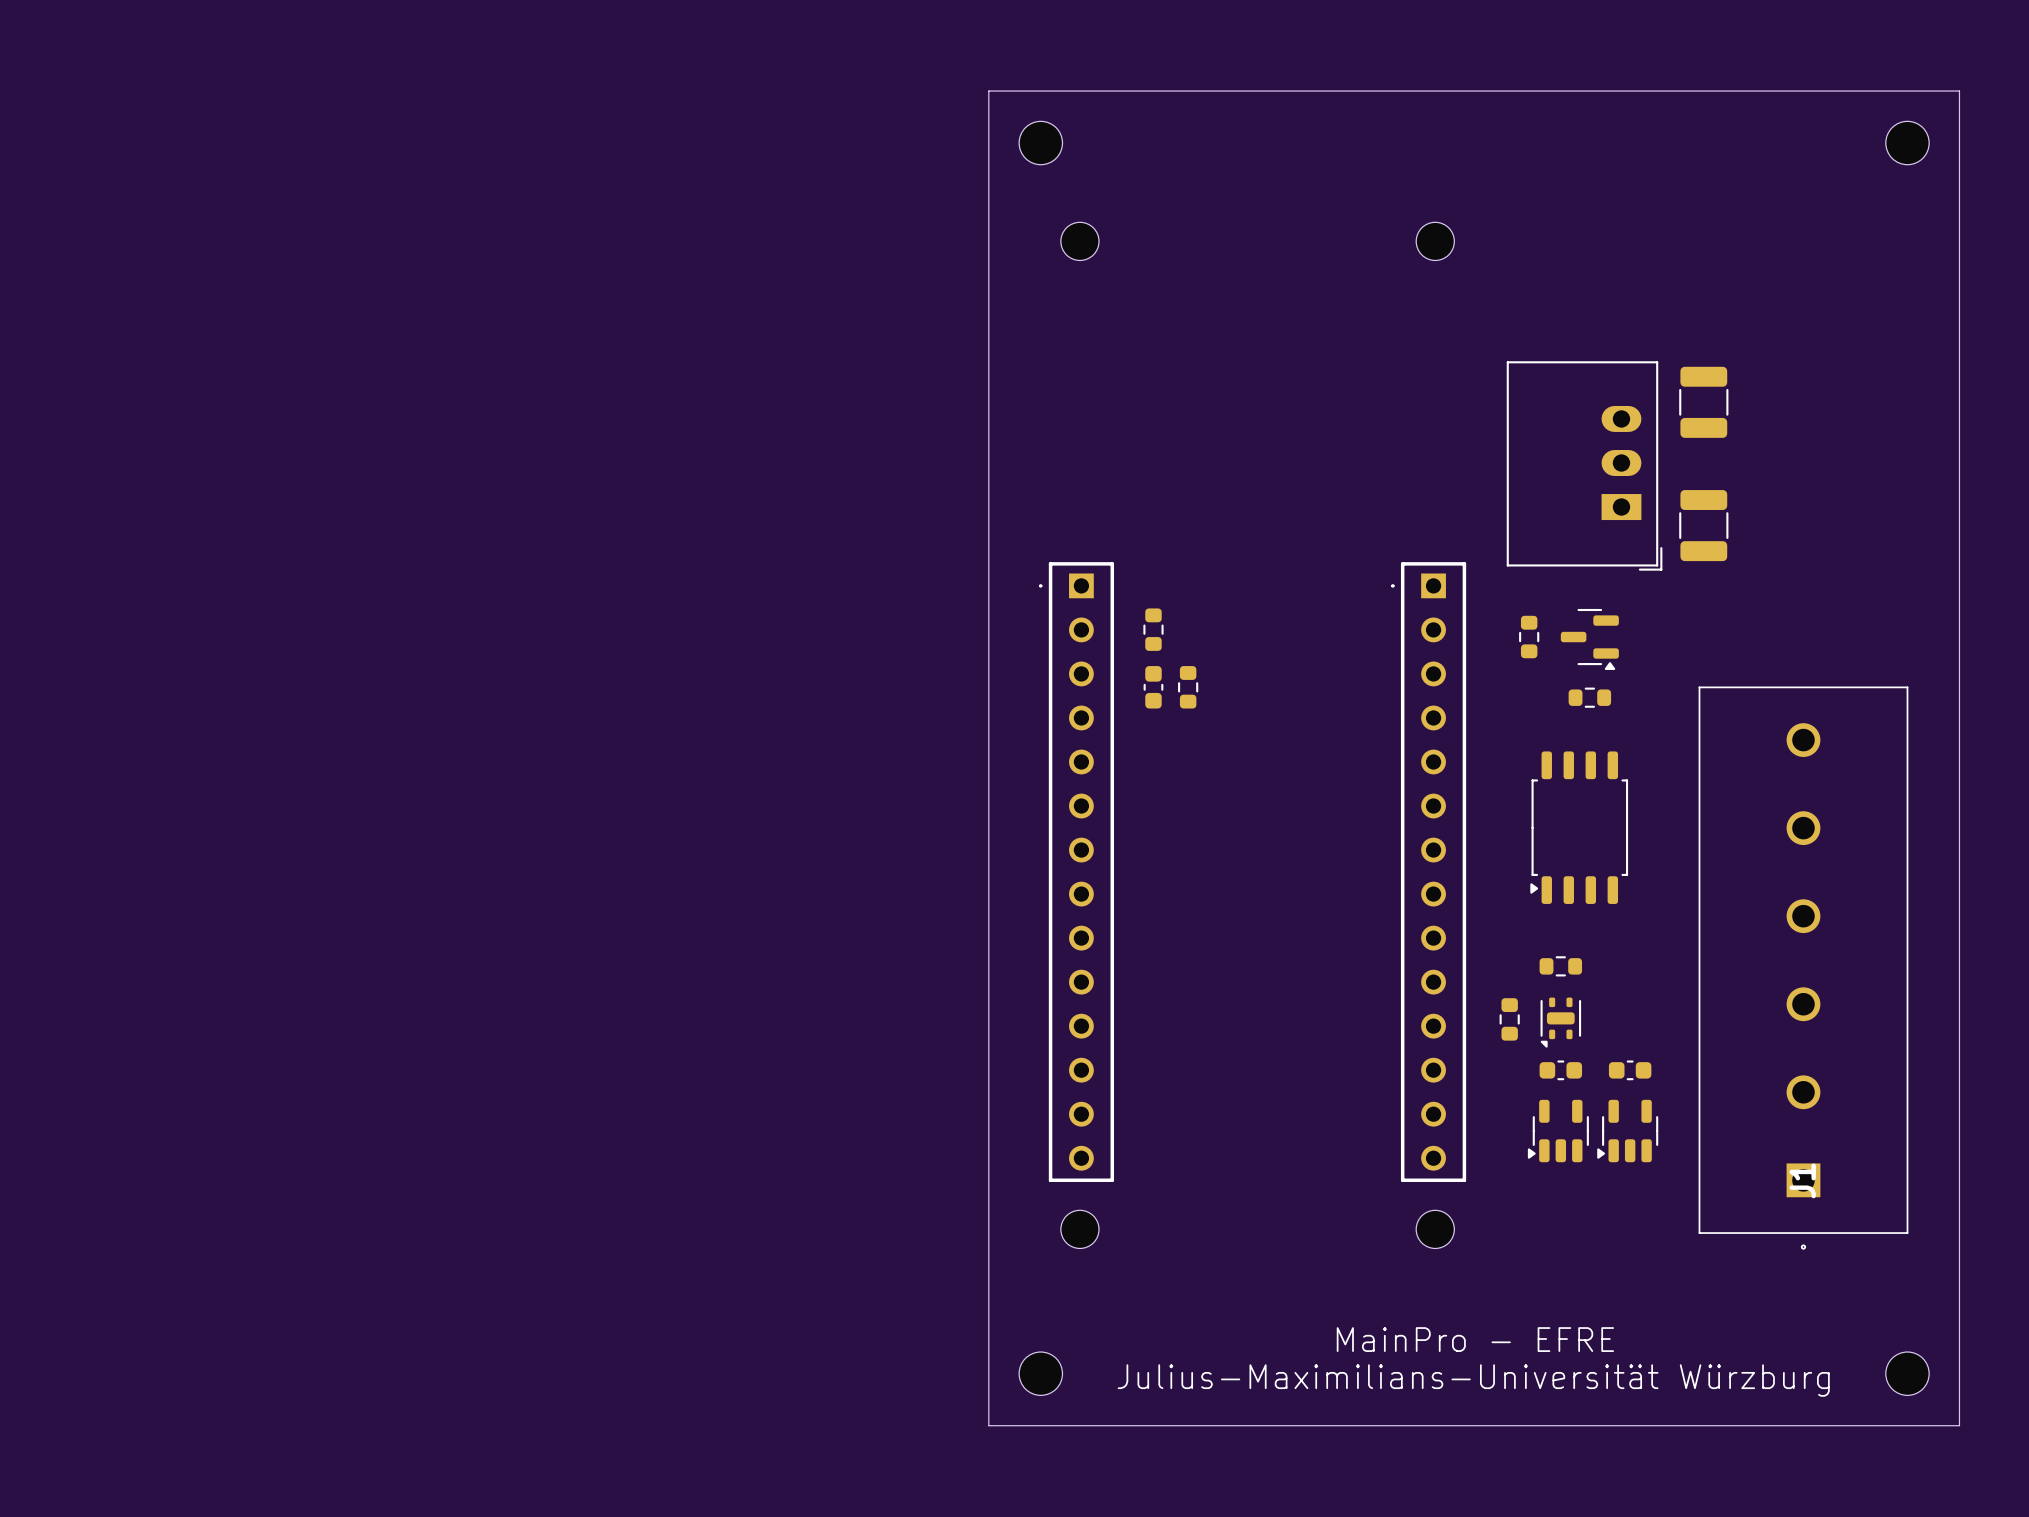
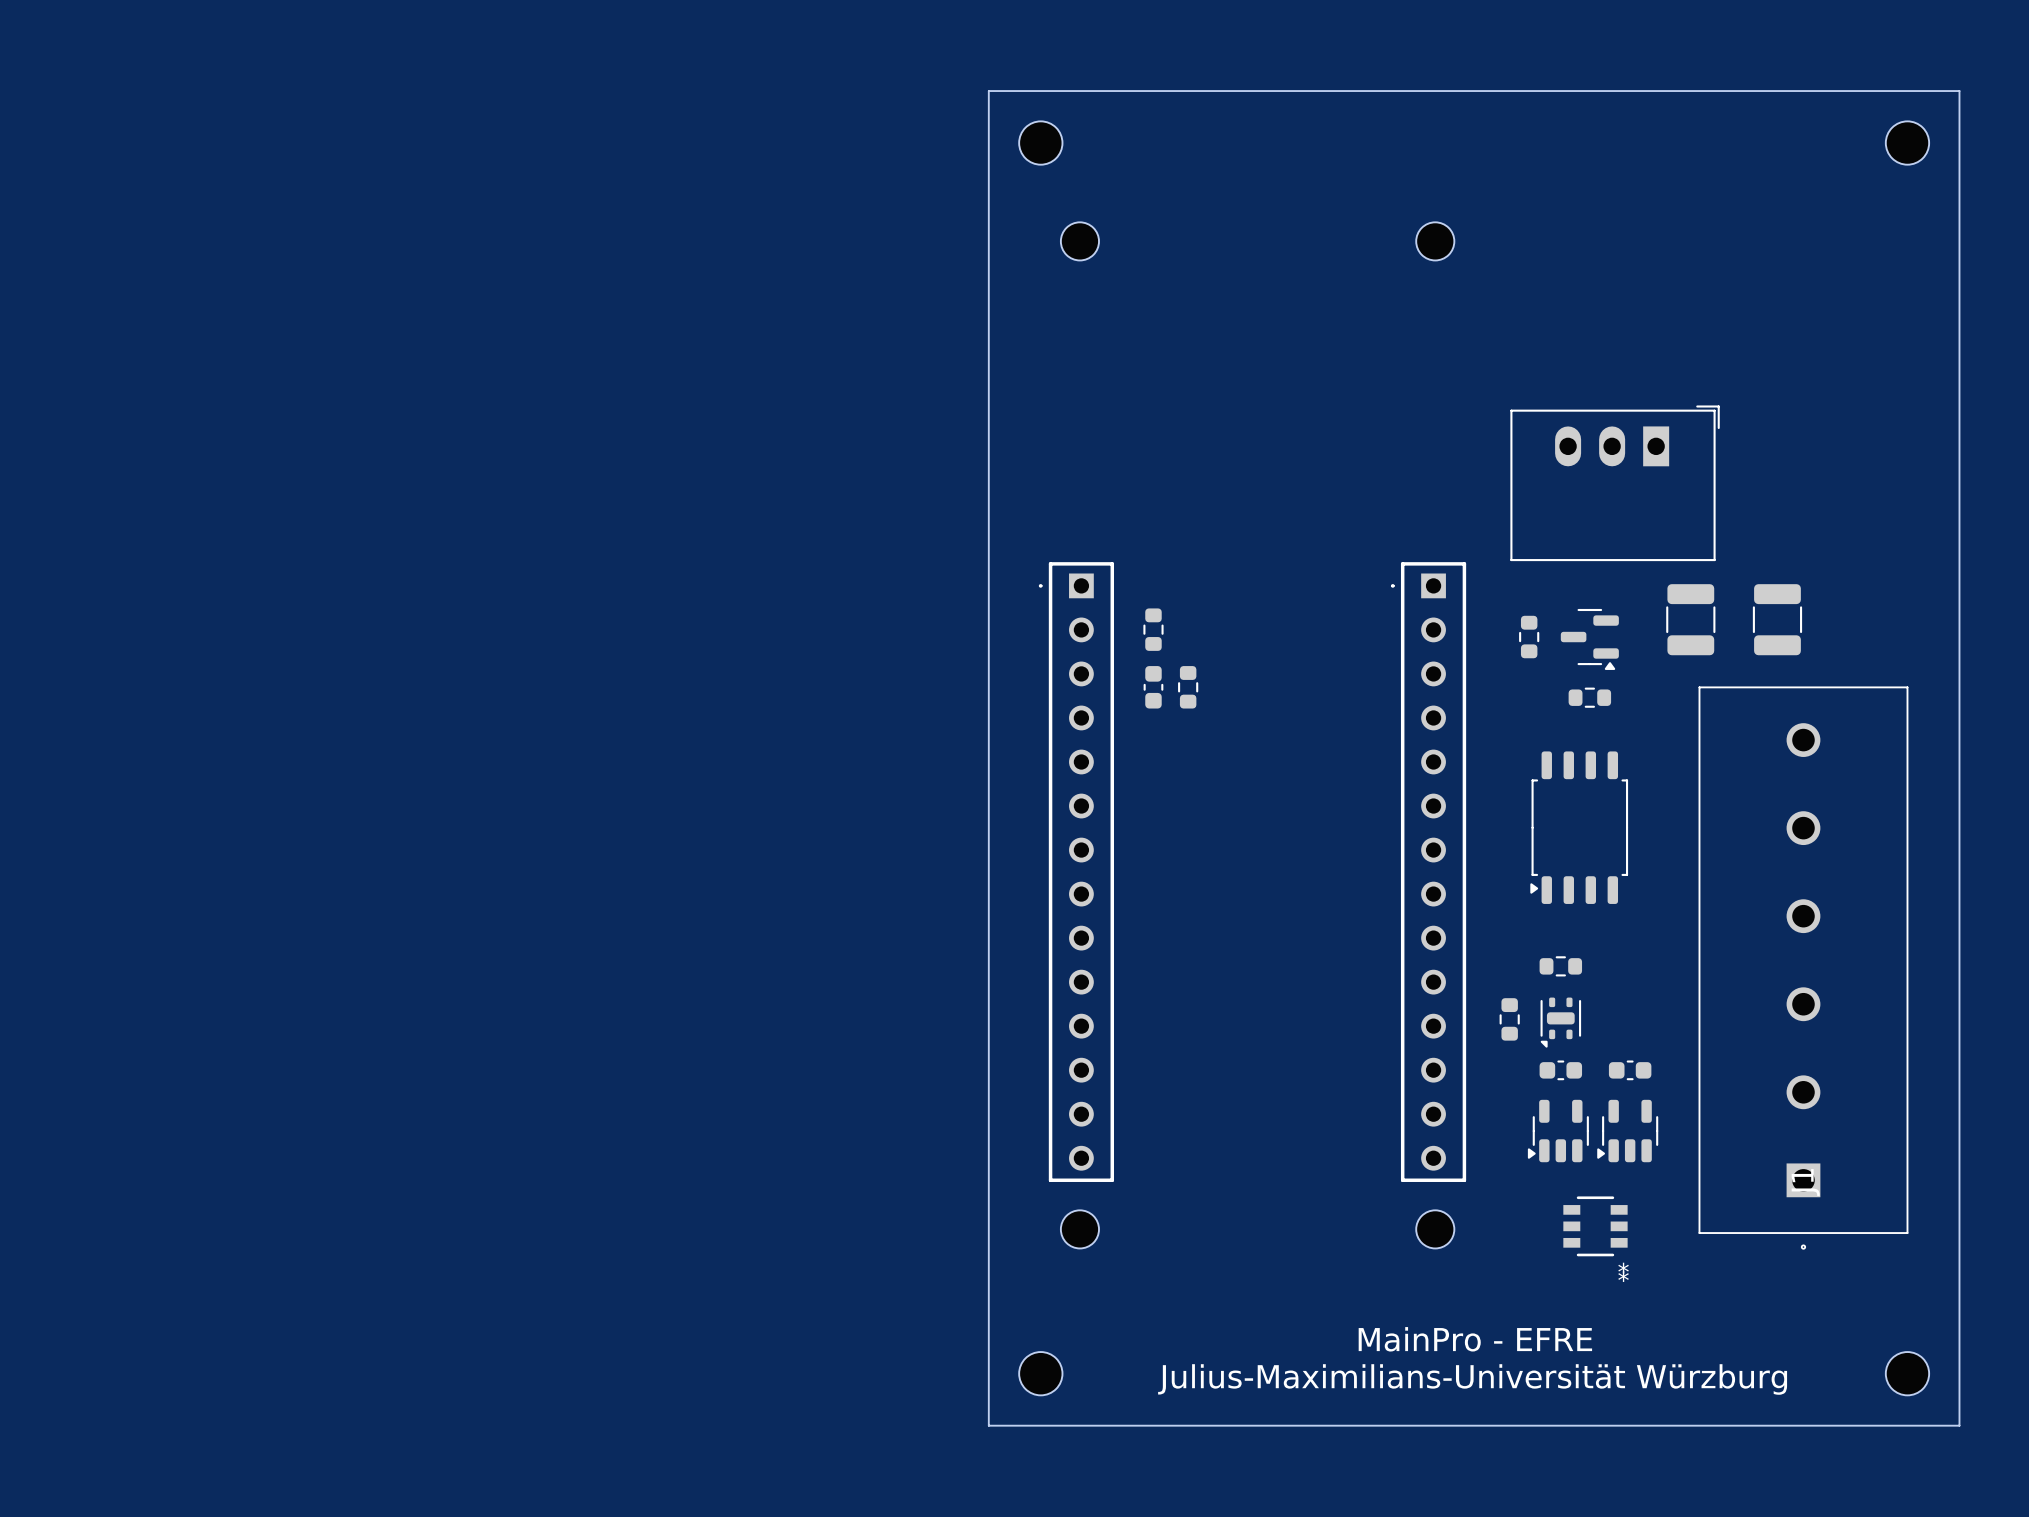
part: (1703, 402) -> none
part rotation: 0° (1584, 465) -> 90° counterclockwise (1615, 483)
part: (1703, 525) -> none
part: none -> (1690, 619)
part: none -> (1777, 619)
part: none -> (1595, 1226)

